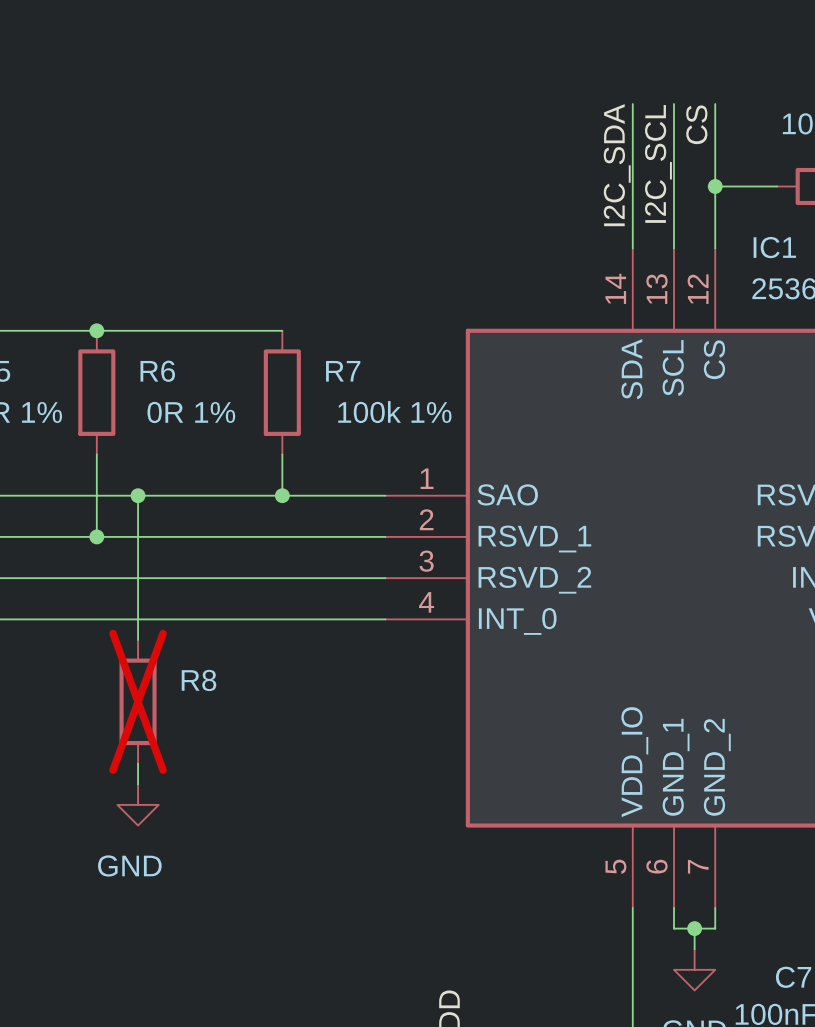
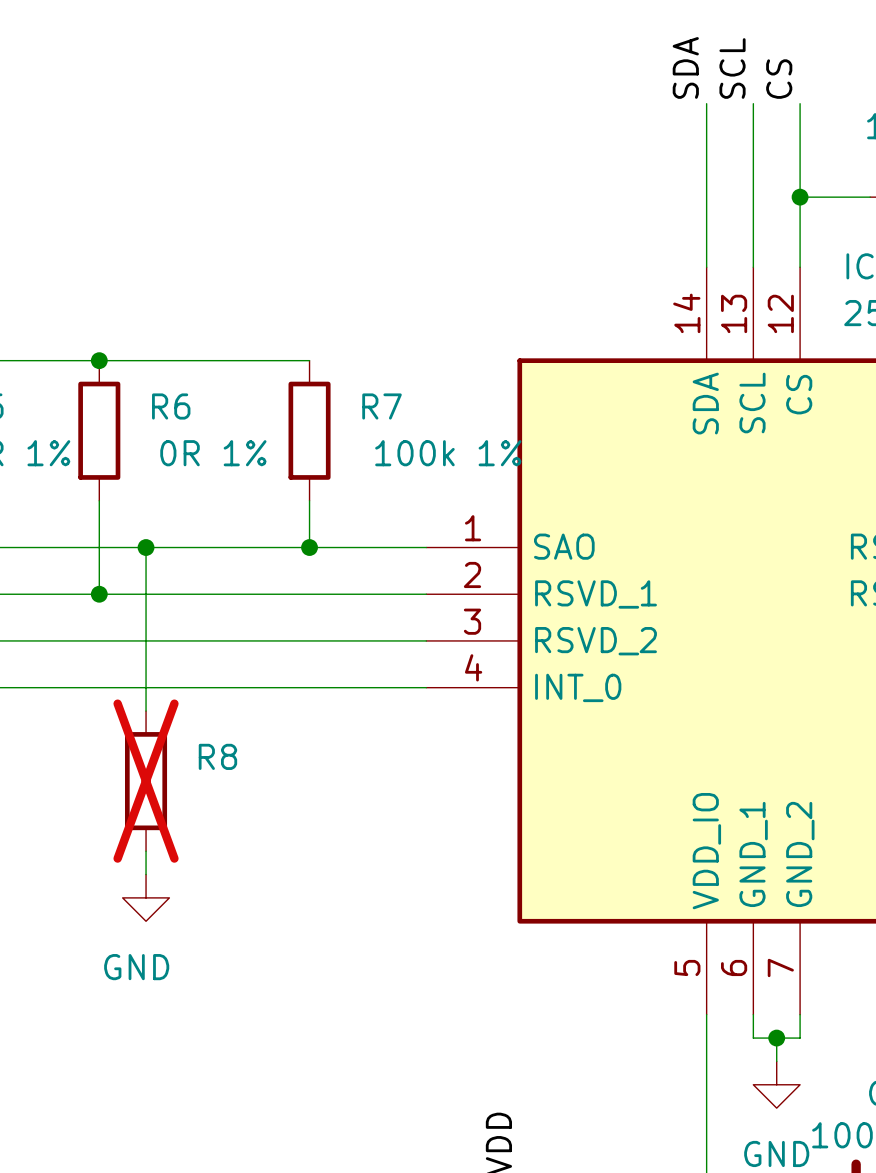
label position: CS (696, 124) -> CS (779, 79)
label: I2C_SCL (658, 163) -> SCL (732, 68)
label: I2C_SDA (617, 165) -> SDA (685, 67)

